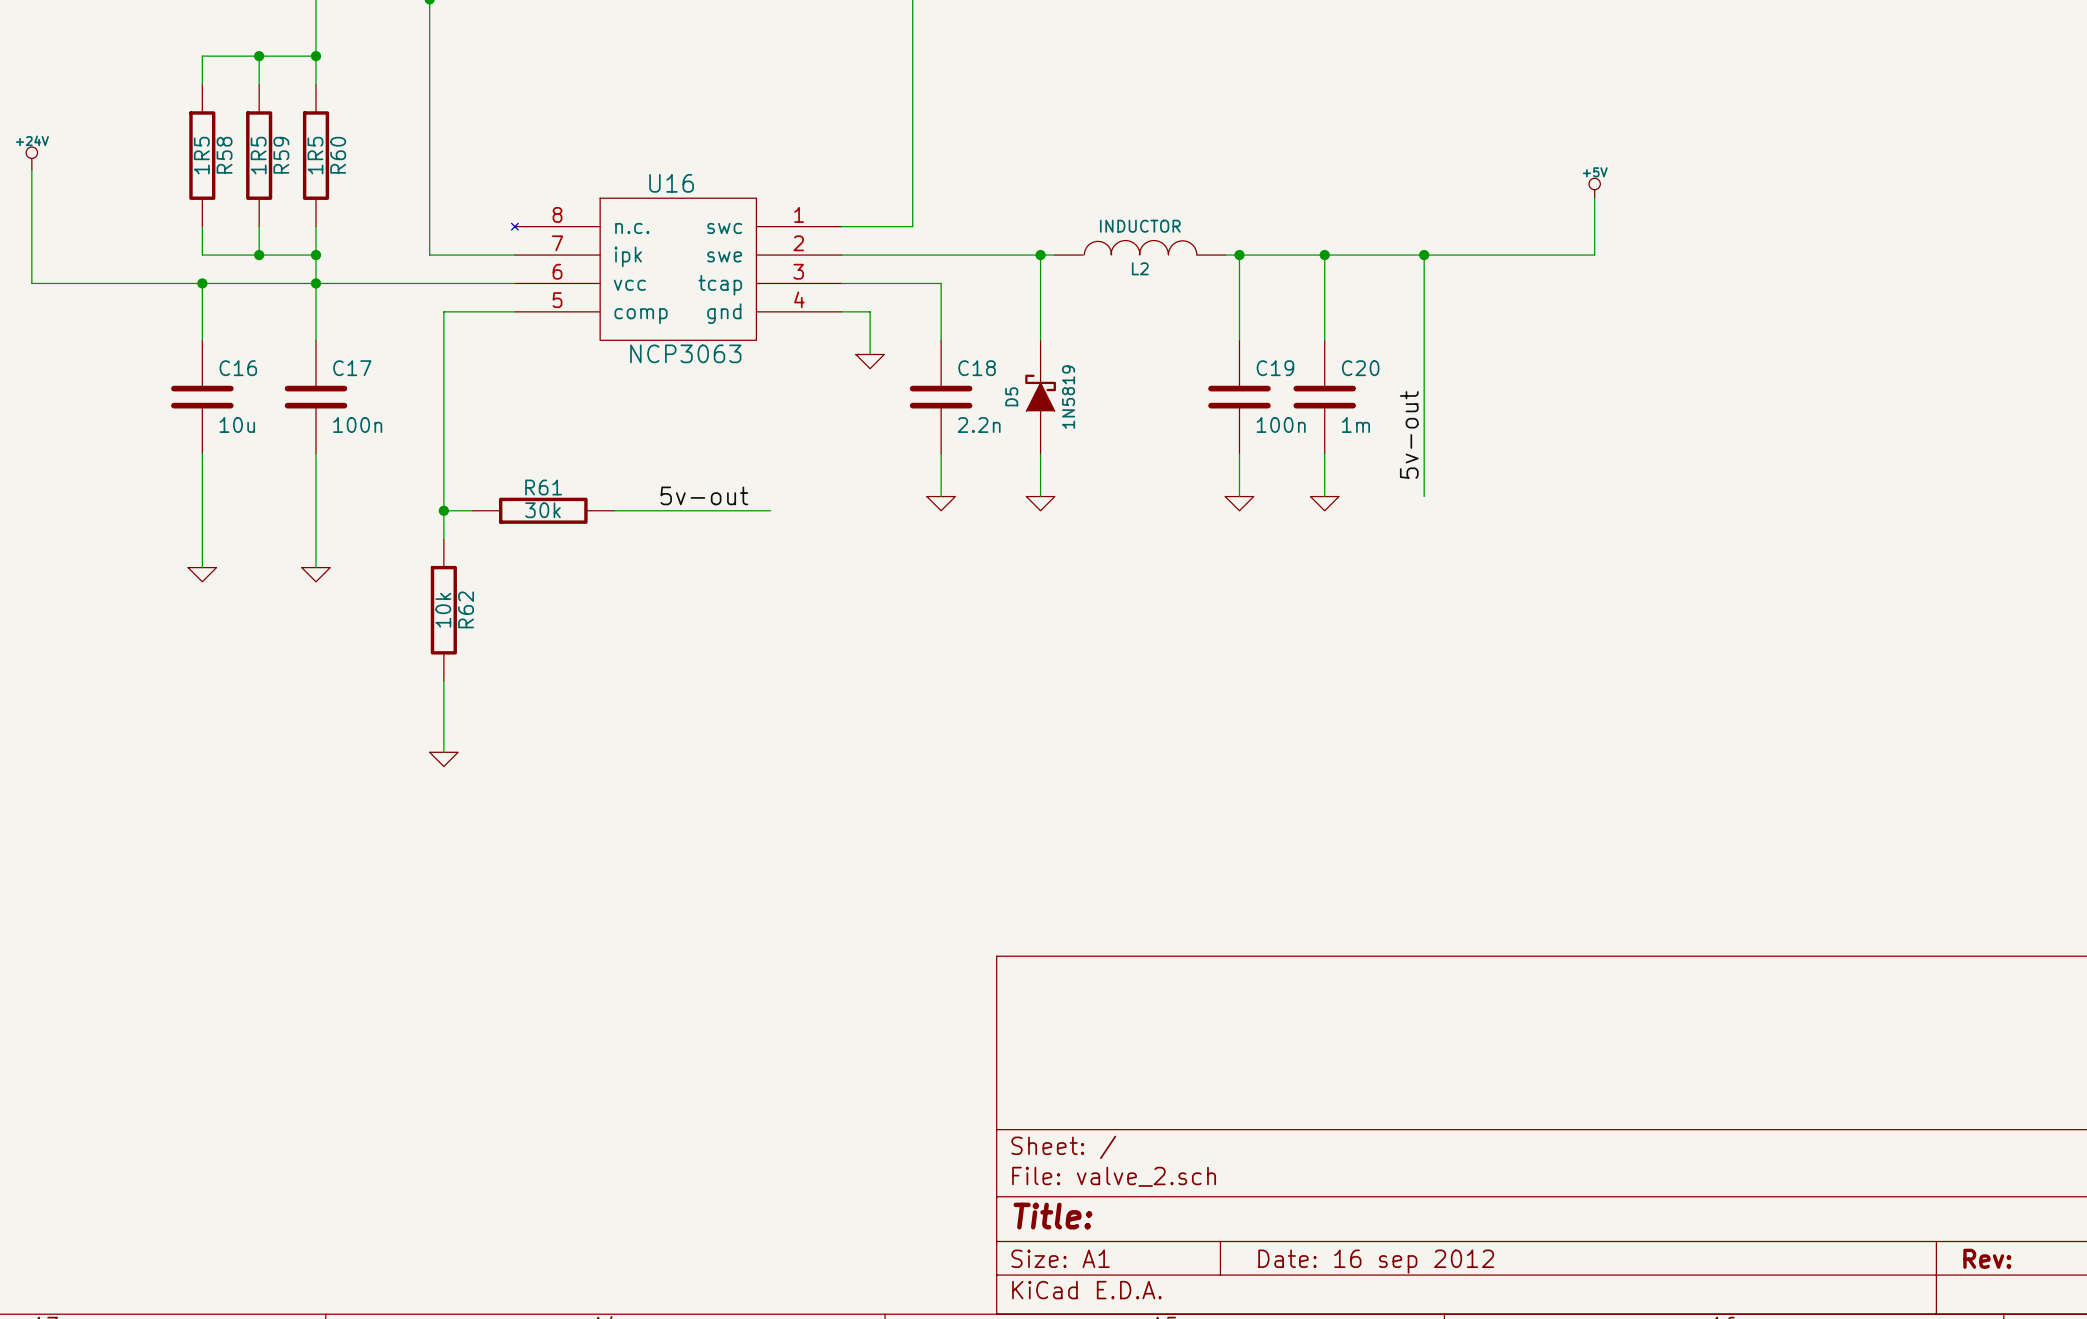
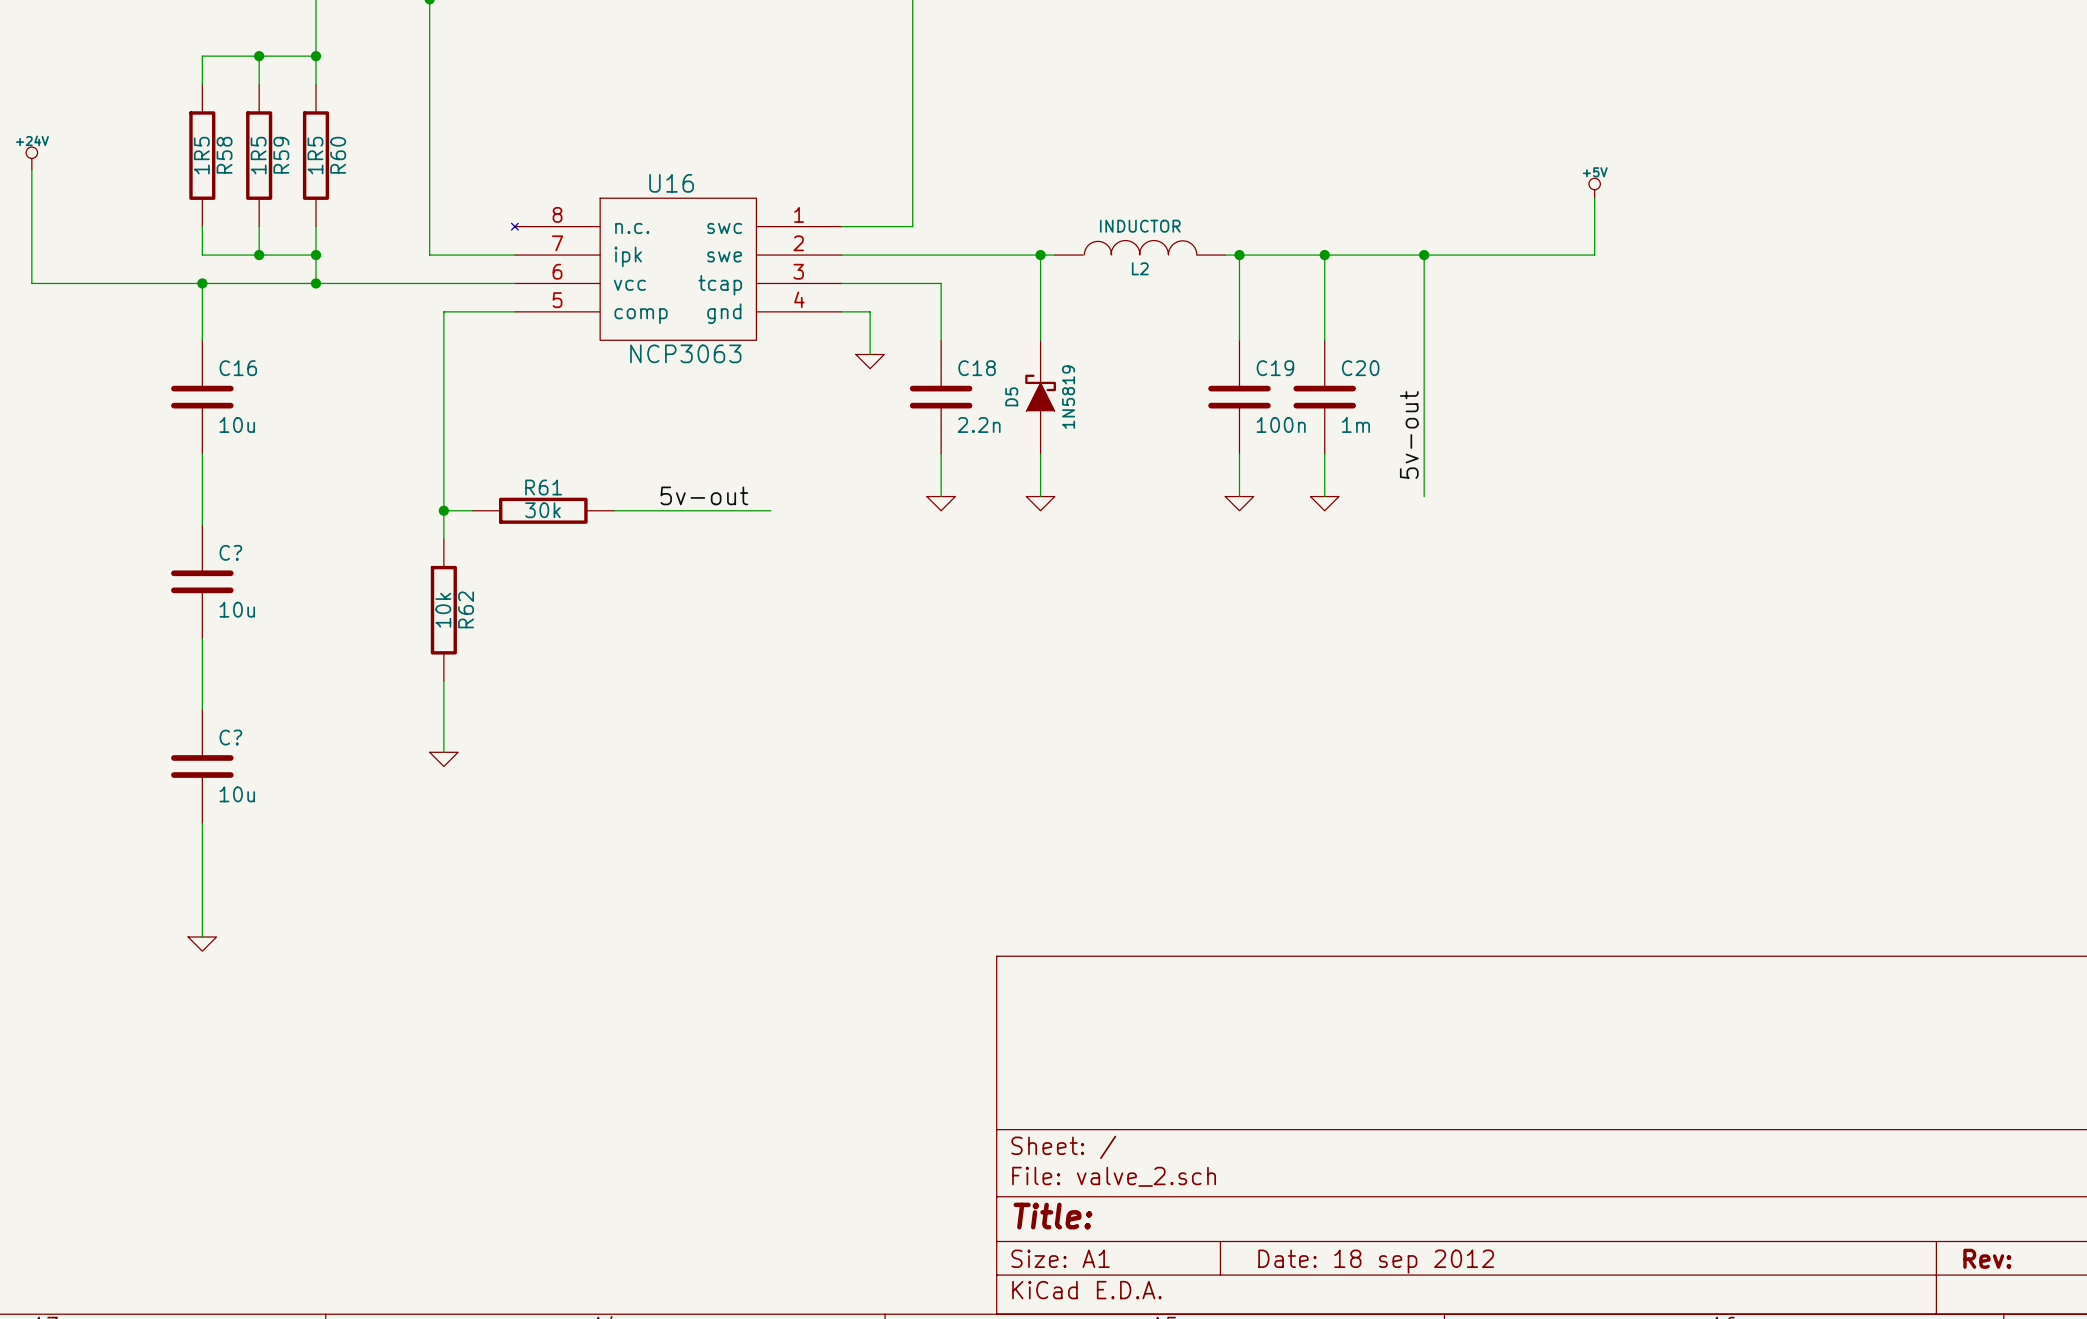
wire: (316, 283) (316, 340) -> none
C17: 100n (316, 397) -> none
wire: (316, 453) (316, 567) -> none
power symbol: (202, 574) -> none
power symbol: (316, 574) -> none
C?: none -> 10u (202, 581)
wire: none -> (202, 638) (202, 709)
C?: none -> 10u (202, 766)
wire: none -> (202, 823) (202, 936)
power symbol: none -> (202, 944)
title block: Date: 16 sep 2012 (1376, 1261) -> Date: 18 sep 2012 (1376, 1261)

